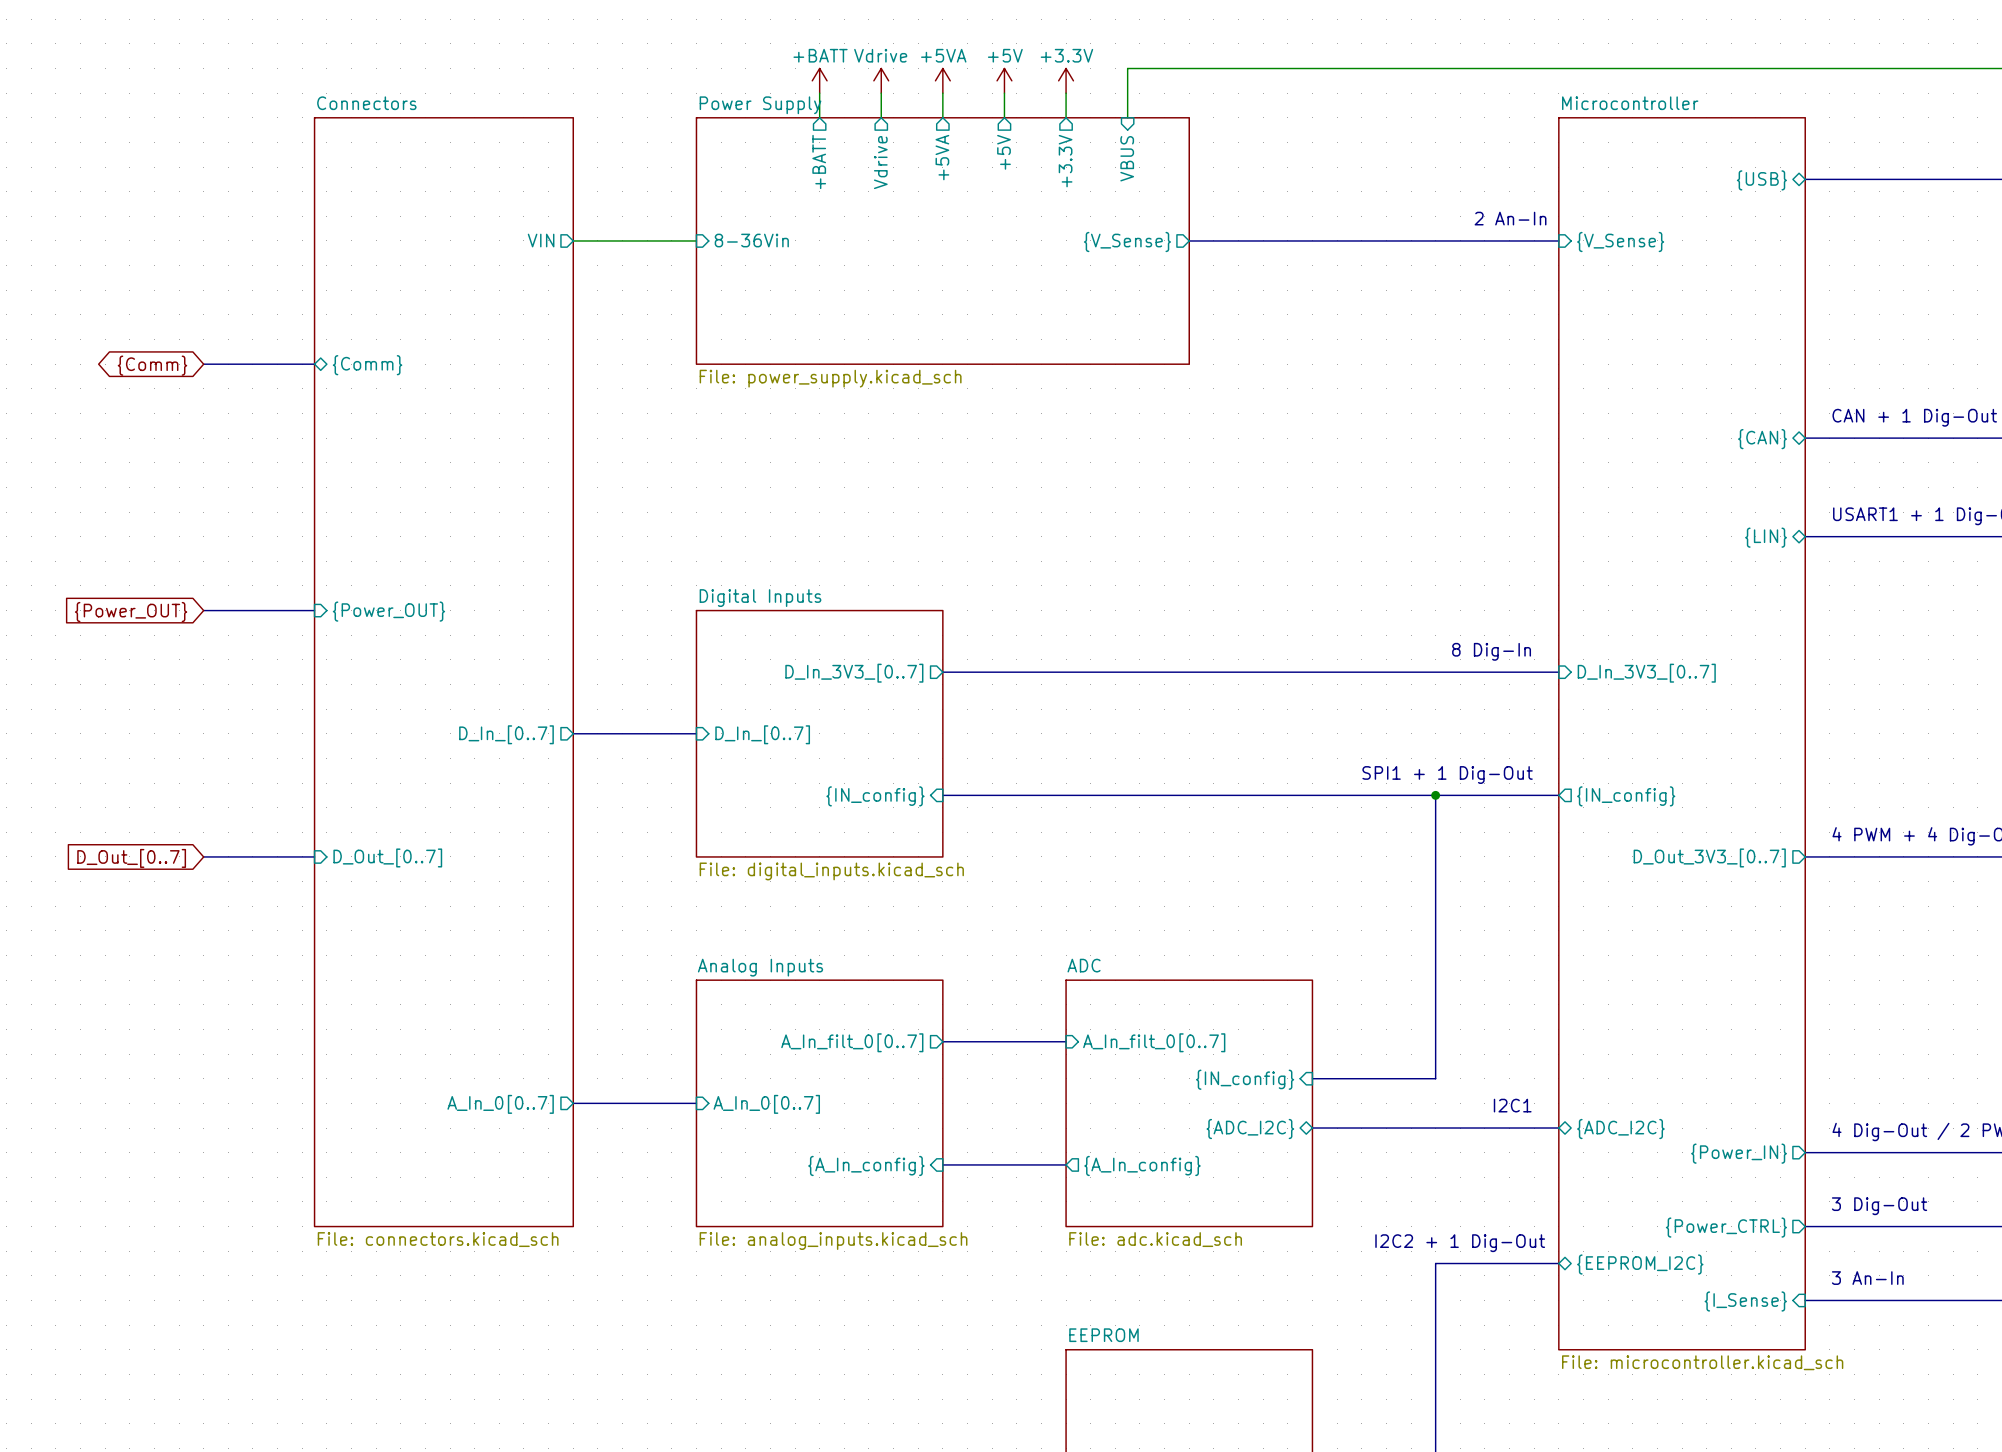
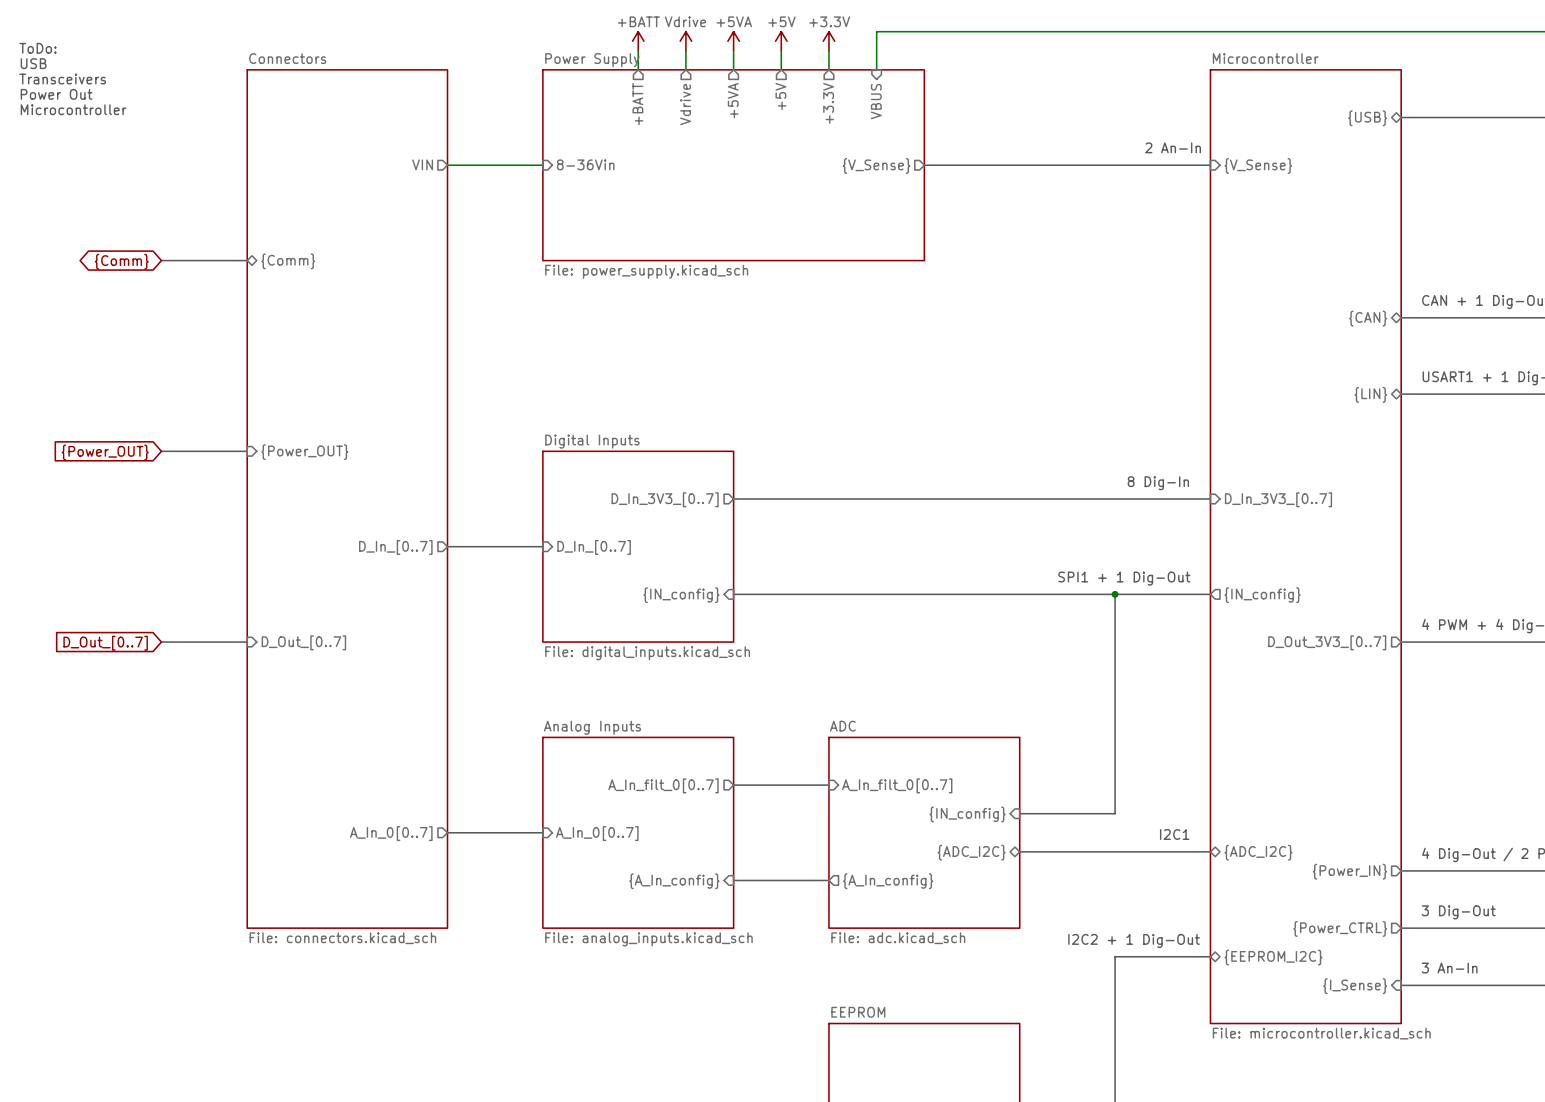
text: none -> ToDo: (37, 48)
text: none -> USB (33, 63)
text: none -> Transceivers (62, 79)
text: none -> Power Out (56, 94)
text: none -> Microcontroller (73, 109)

